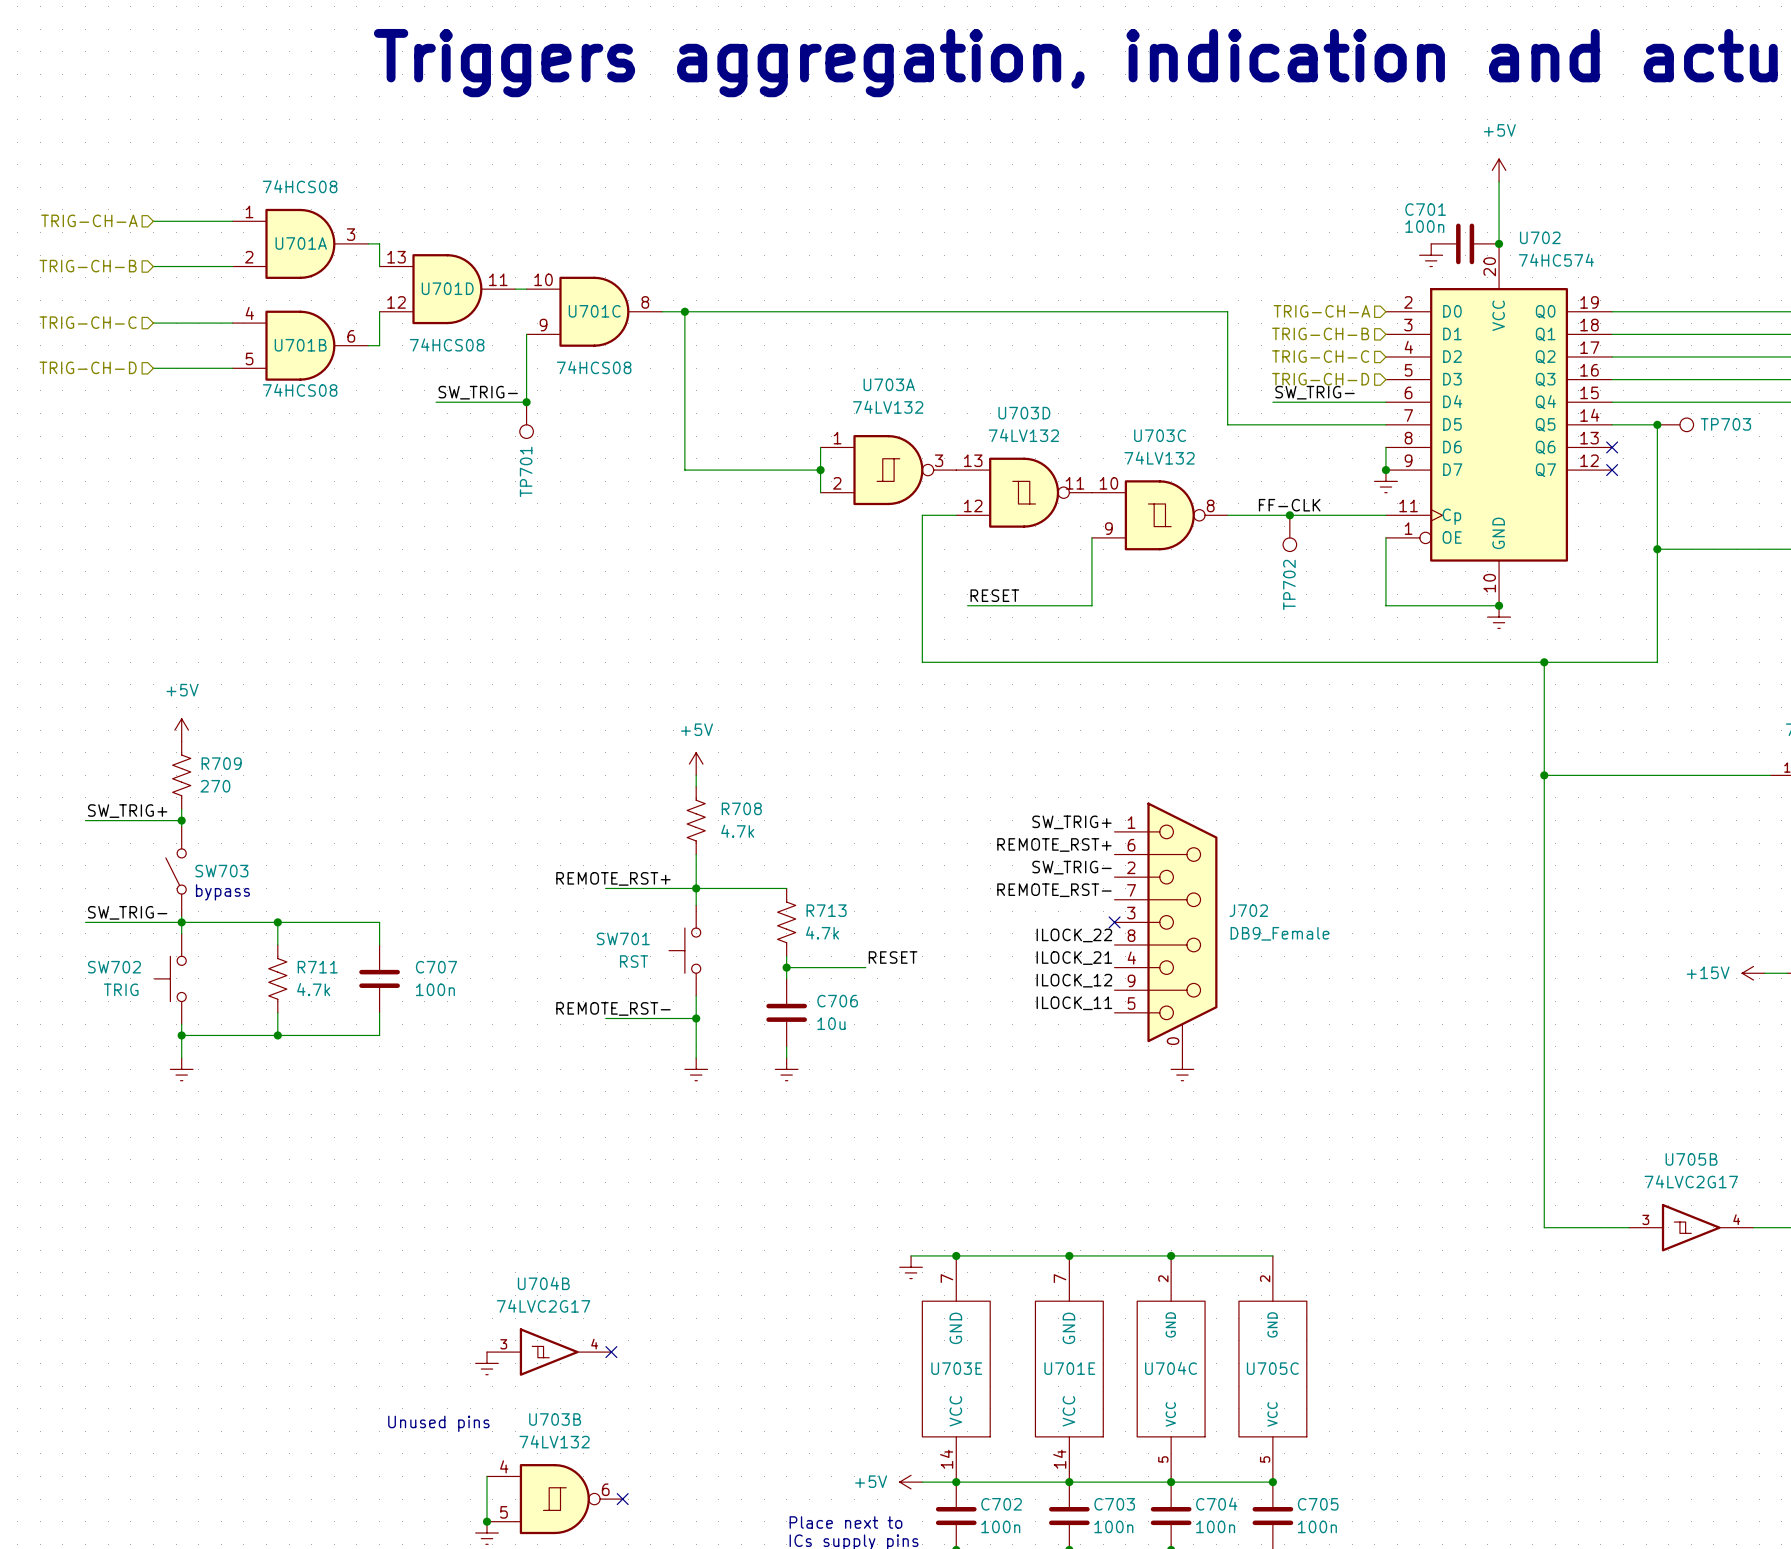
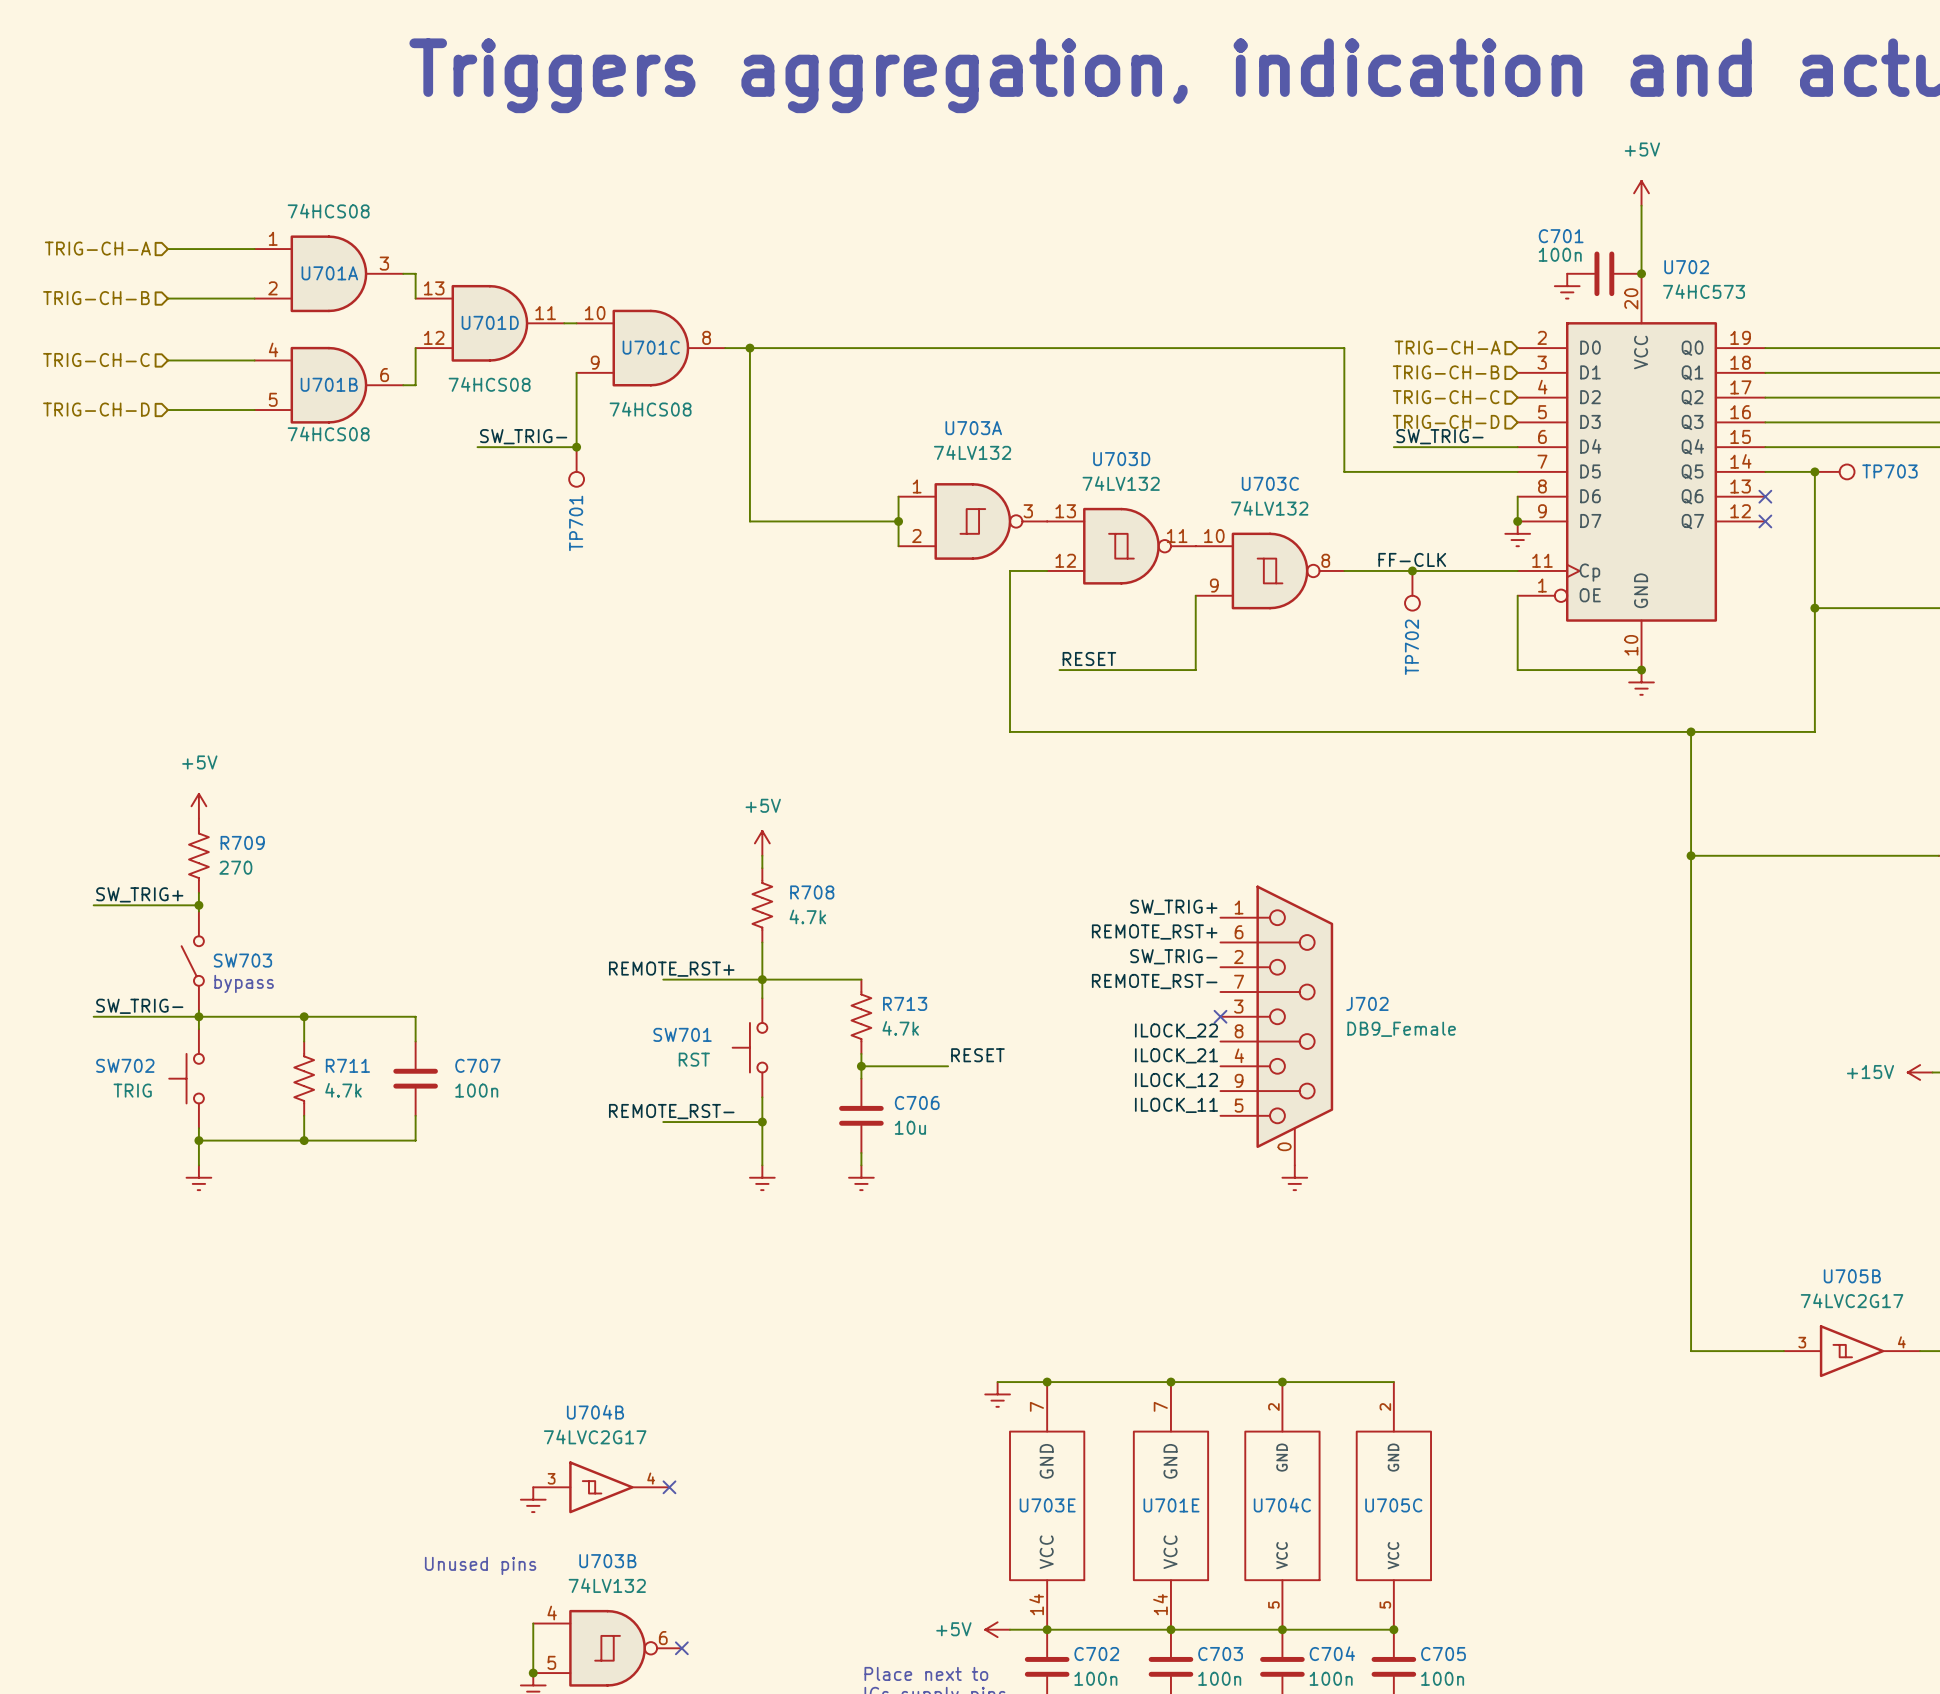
U702 value: 74HC574 (1556, 260) -> 74HC573 (1704, 291)

